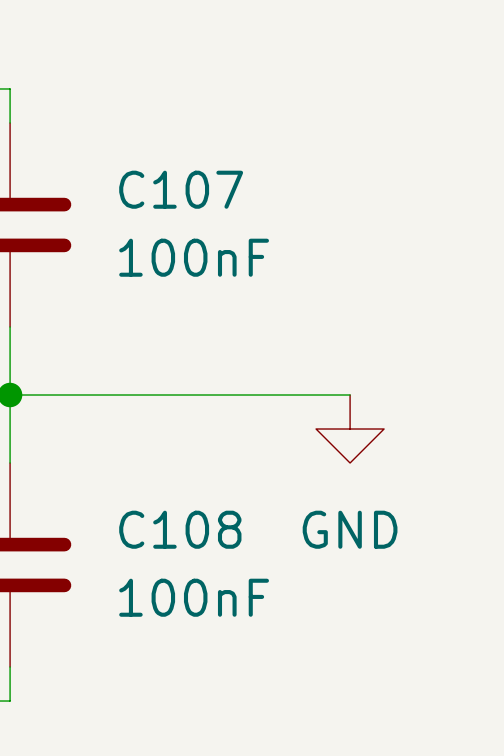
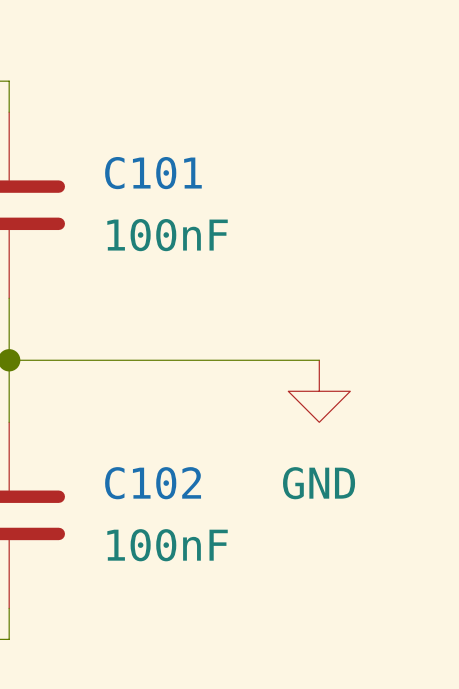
C107 name: C107 (181, 189) -> C101 (153, 173)
C108 name: C108 (180, 529) -> C102 (153, 483)

